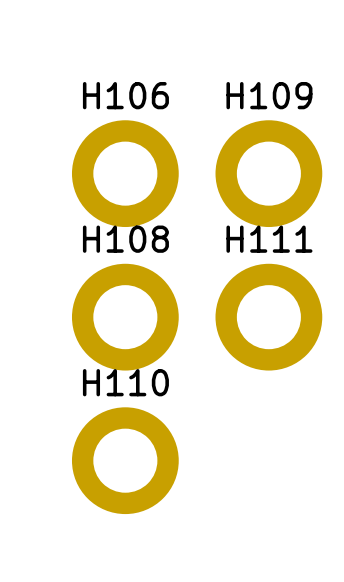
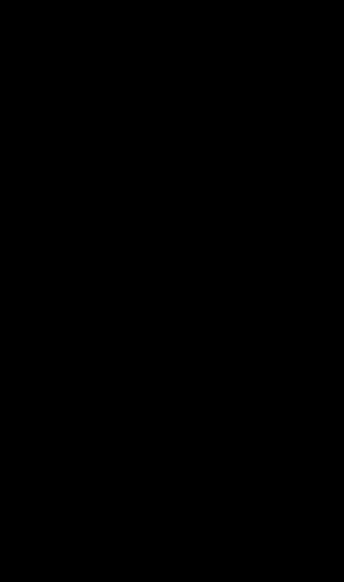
H106: (125, 173) -> none
H109: (268, 173) -> none
H108: (125, 317) -> none
H111: (268, 317) -> none
H110: (125, 460) -> none

